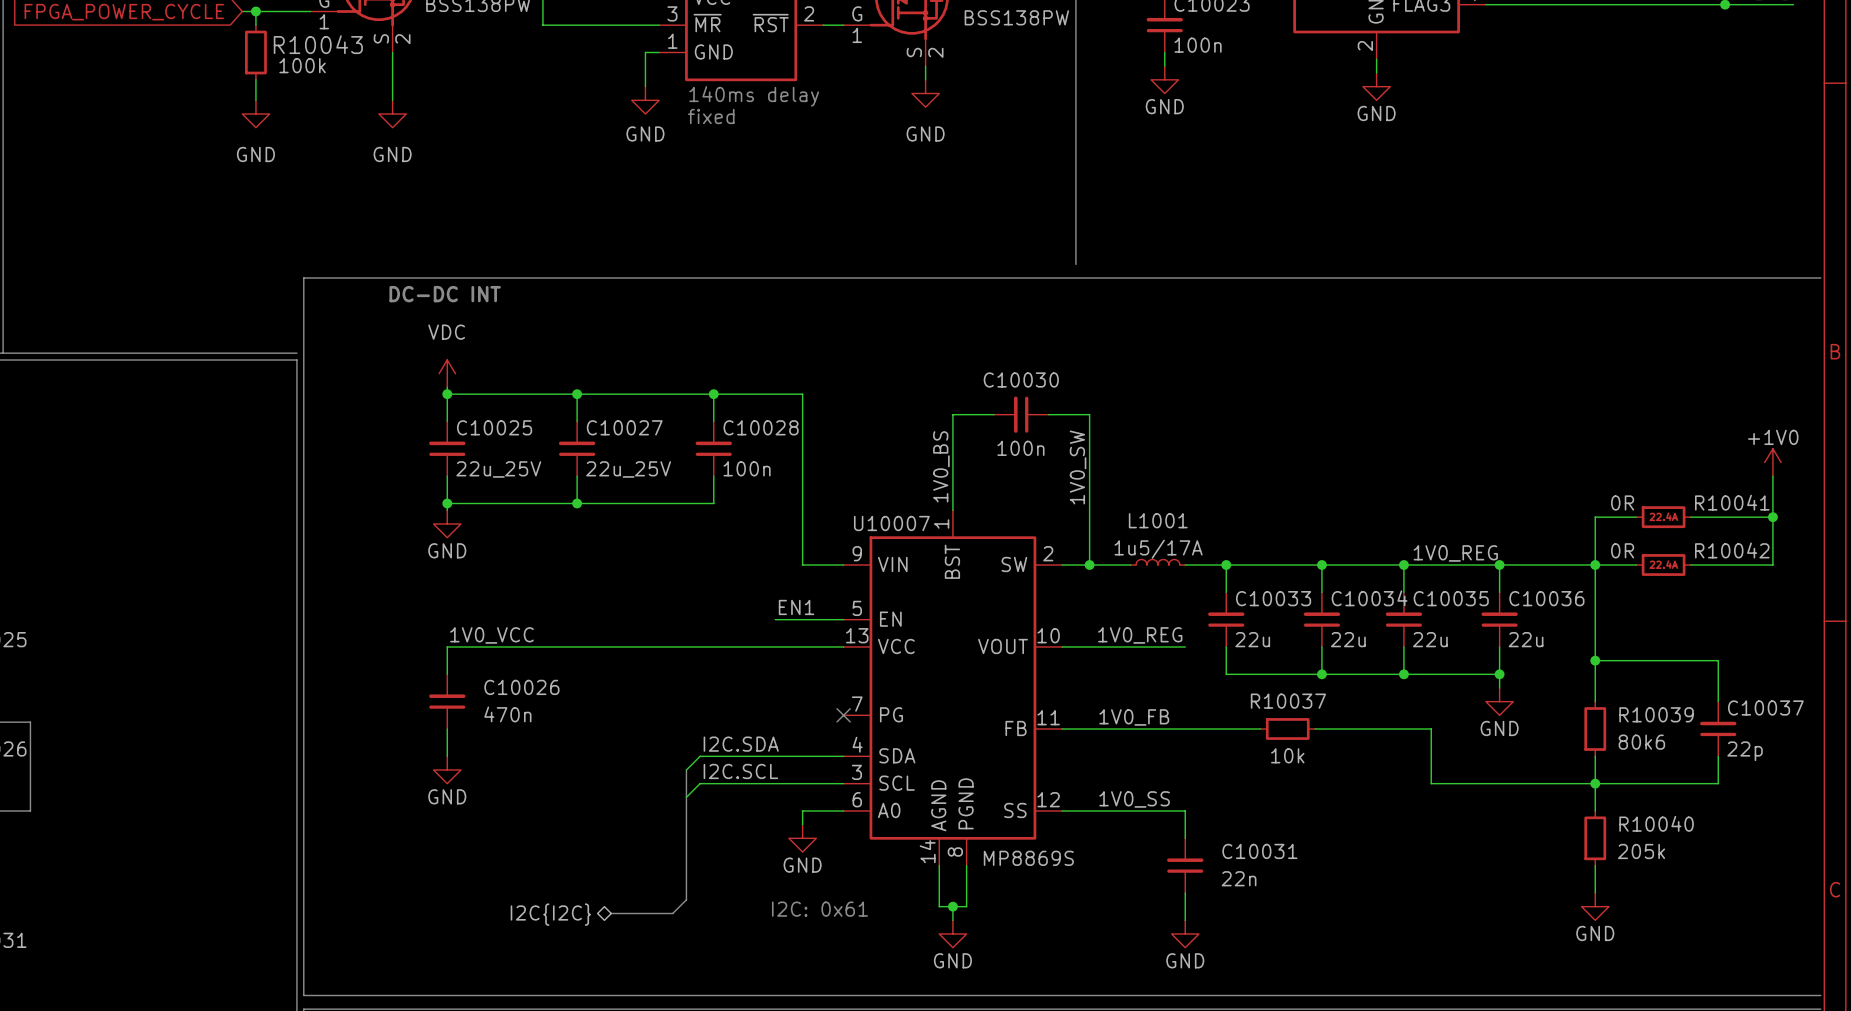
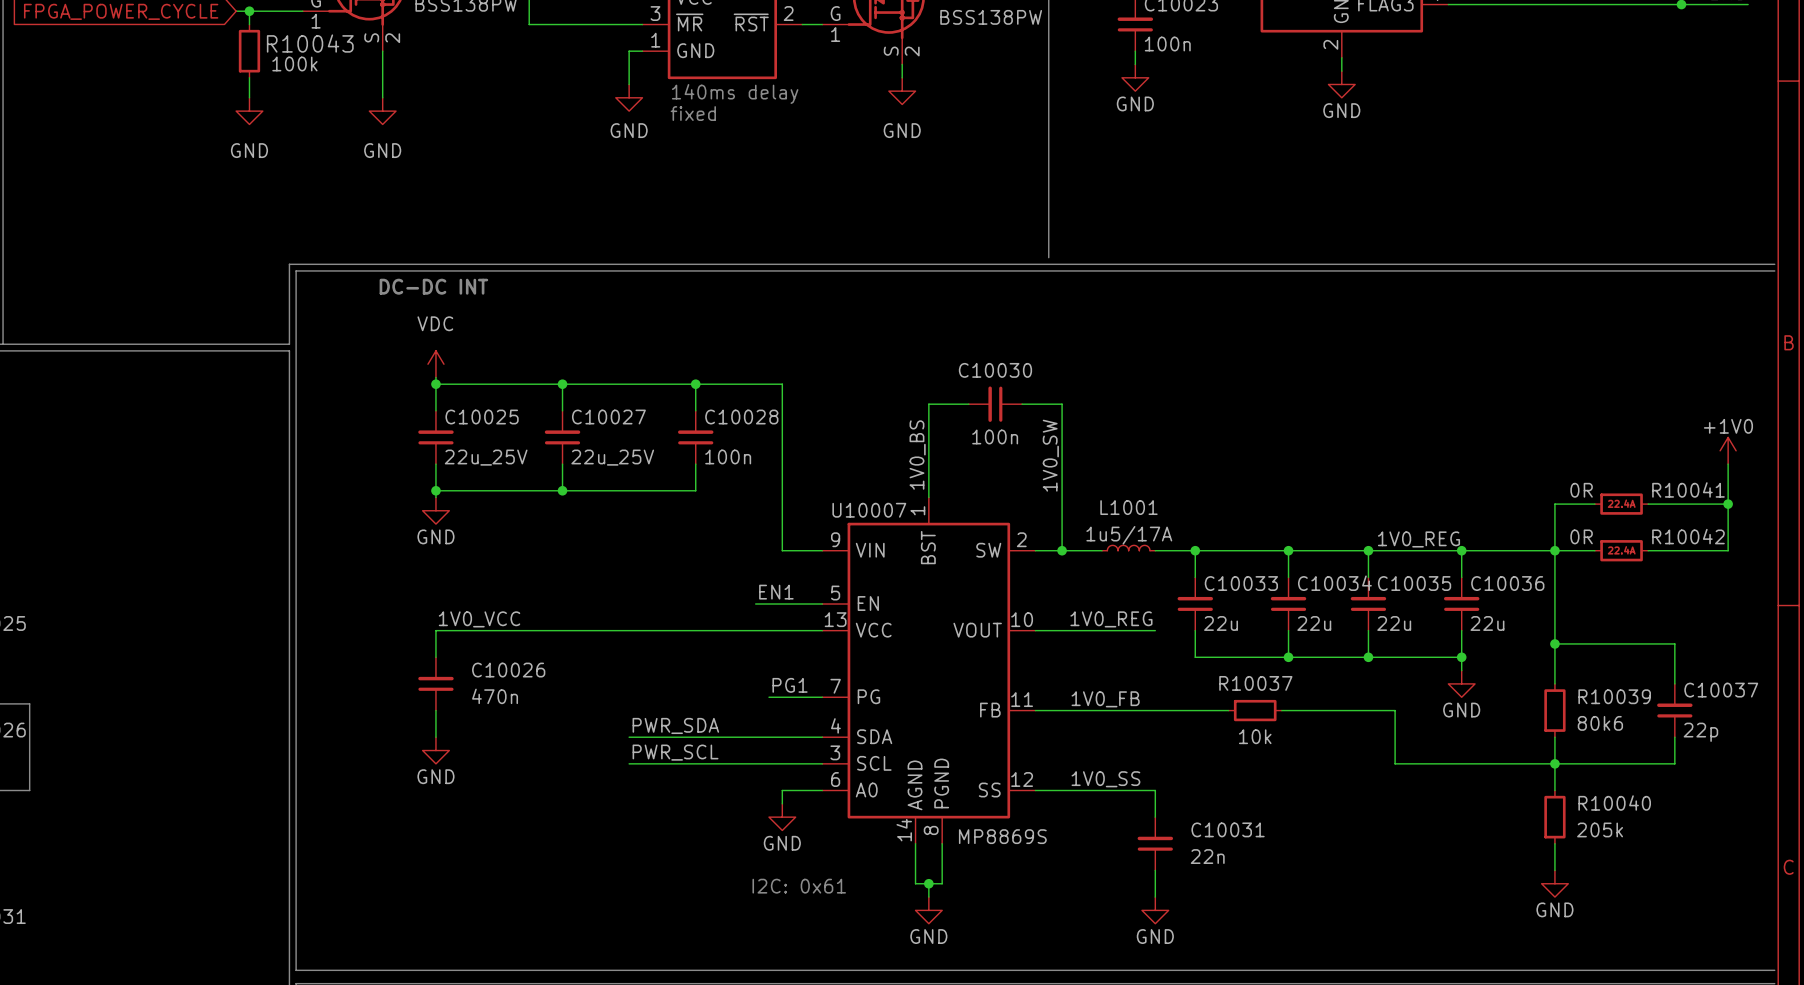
line: none -> (1774, 264) (289, 264) (289, 344)
label: none -> PG1 (790, 685)
wire: none -> (769, 697) (822, 697)
no-connect mark: (843, 715) -> none
label: none -> PWR_SDA (675, 725)
label: I2C.SDA (741, 744) -> none
wire: (700, 756) (686, 770) -> (682, 737) (629, 737)
bus: (686, 770) (686, 899) (672, 913) (611, 913) -> none
label: I2C.SCL (740, 771) -> none
label: none -> PWR_SCL (675, 752)
wire: (700, 783) (686, 797) -> (682, 763) (629, 763)
hierarchical label: I2C{I2C} (550, 914) -> none

